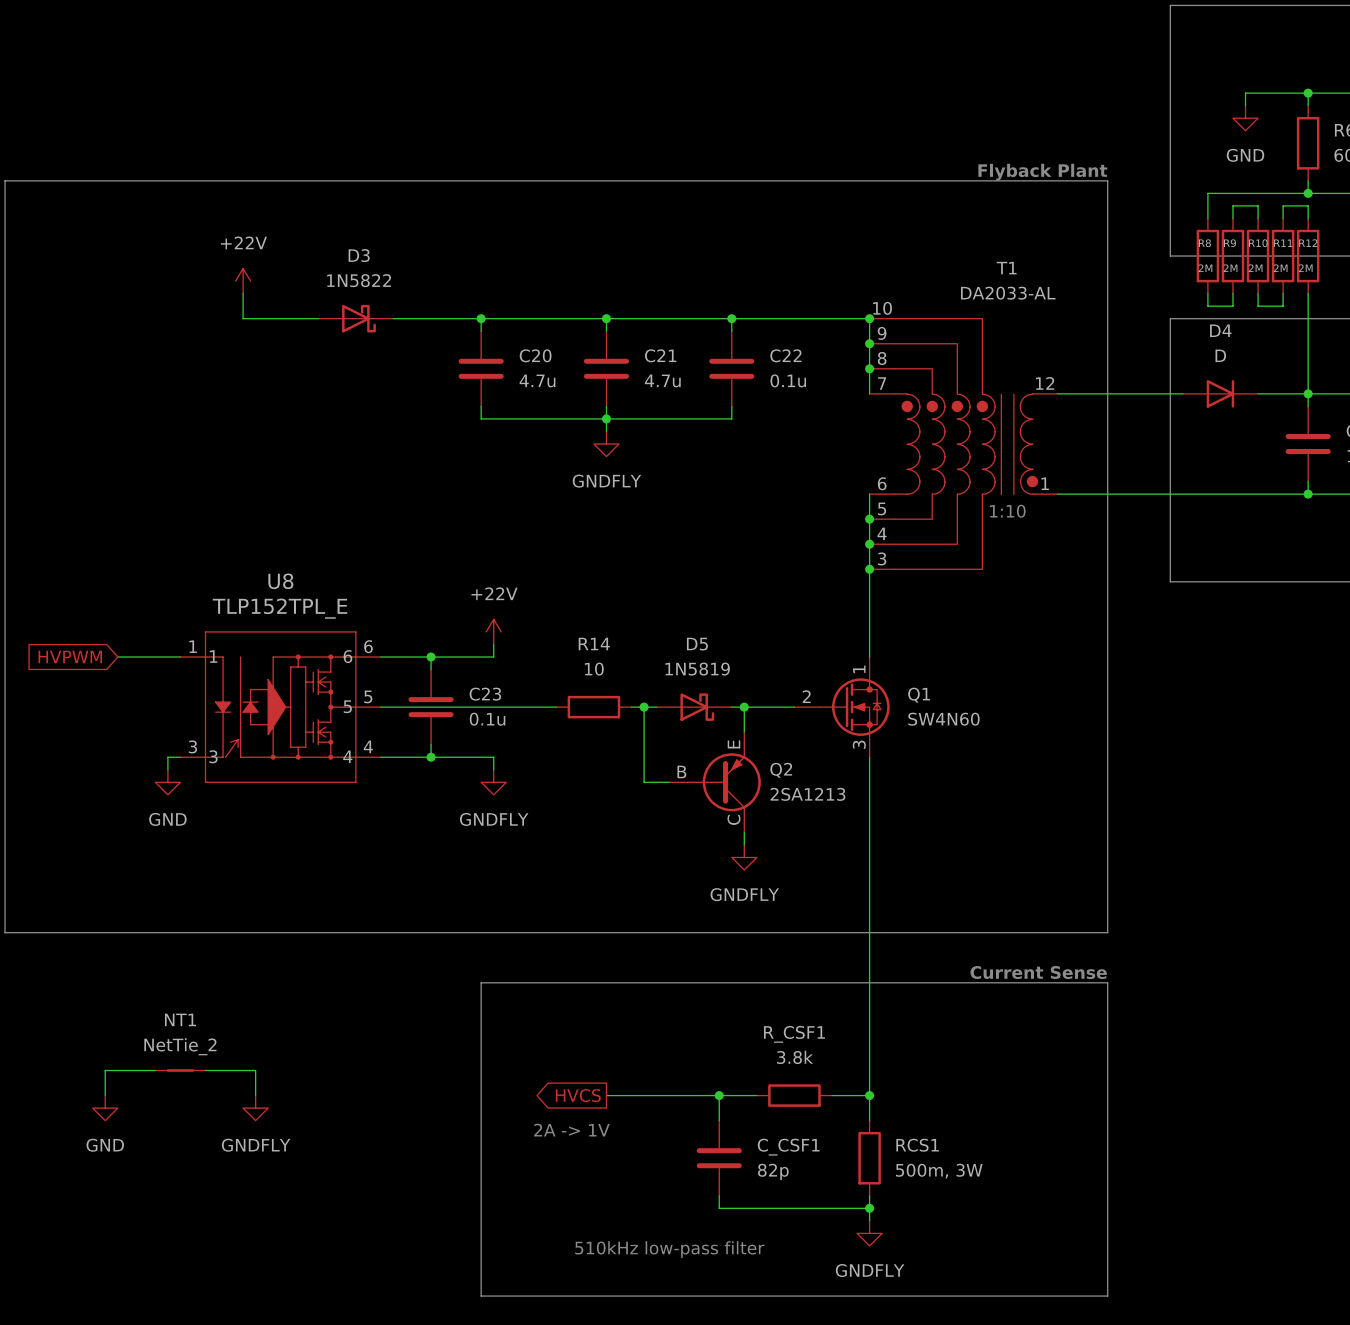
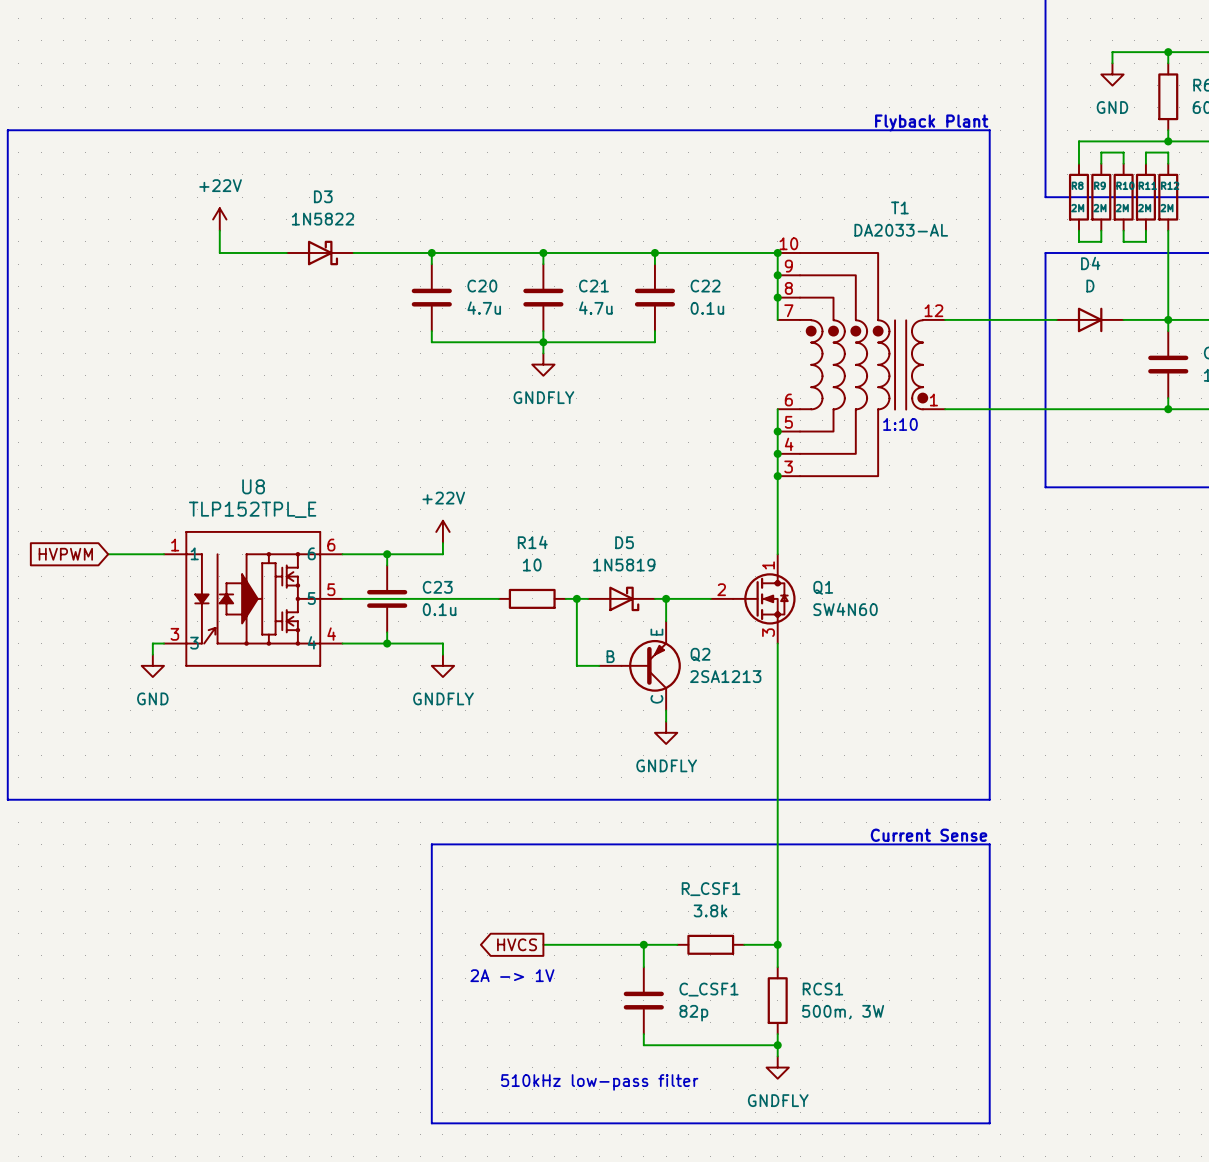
wire: (155, 1070) (105, 1070) (105, 1095) -> none
NT1: NetTie_2 (180, 1070) -> none
wire: (205, 1070) (255, 1070) (255, 1095) -> none
power symbol: GND (105, 1108) -> none
power symbol: GNDFLY (255, 1108) -> none

